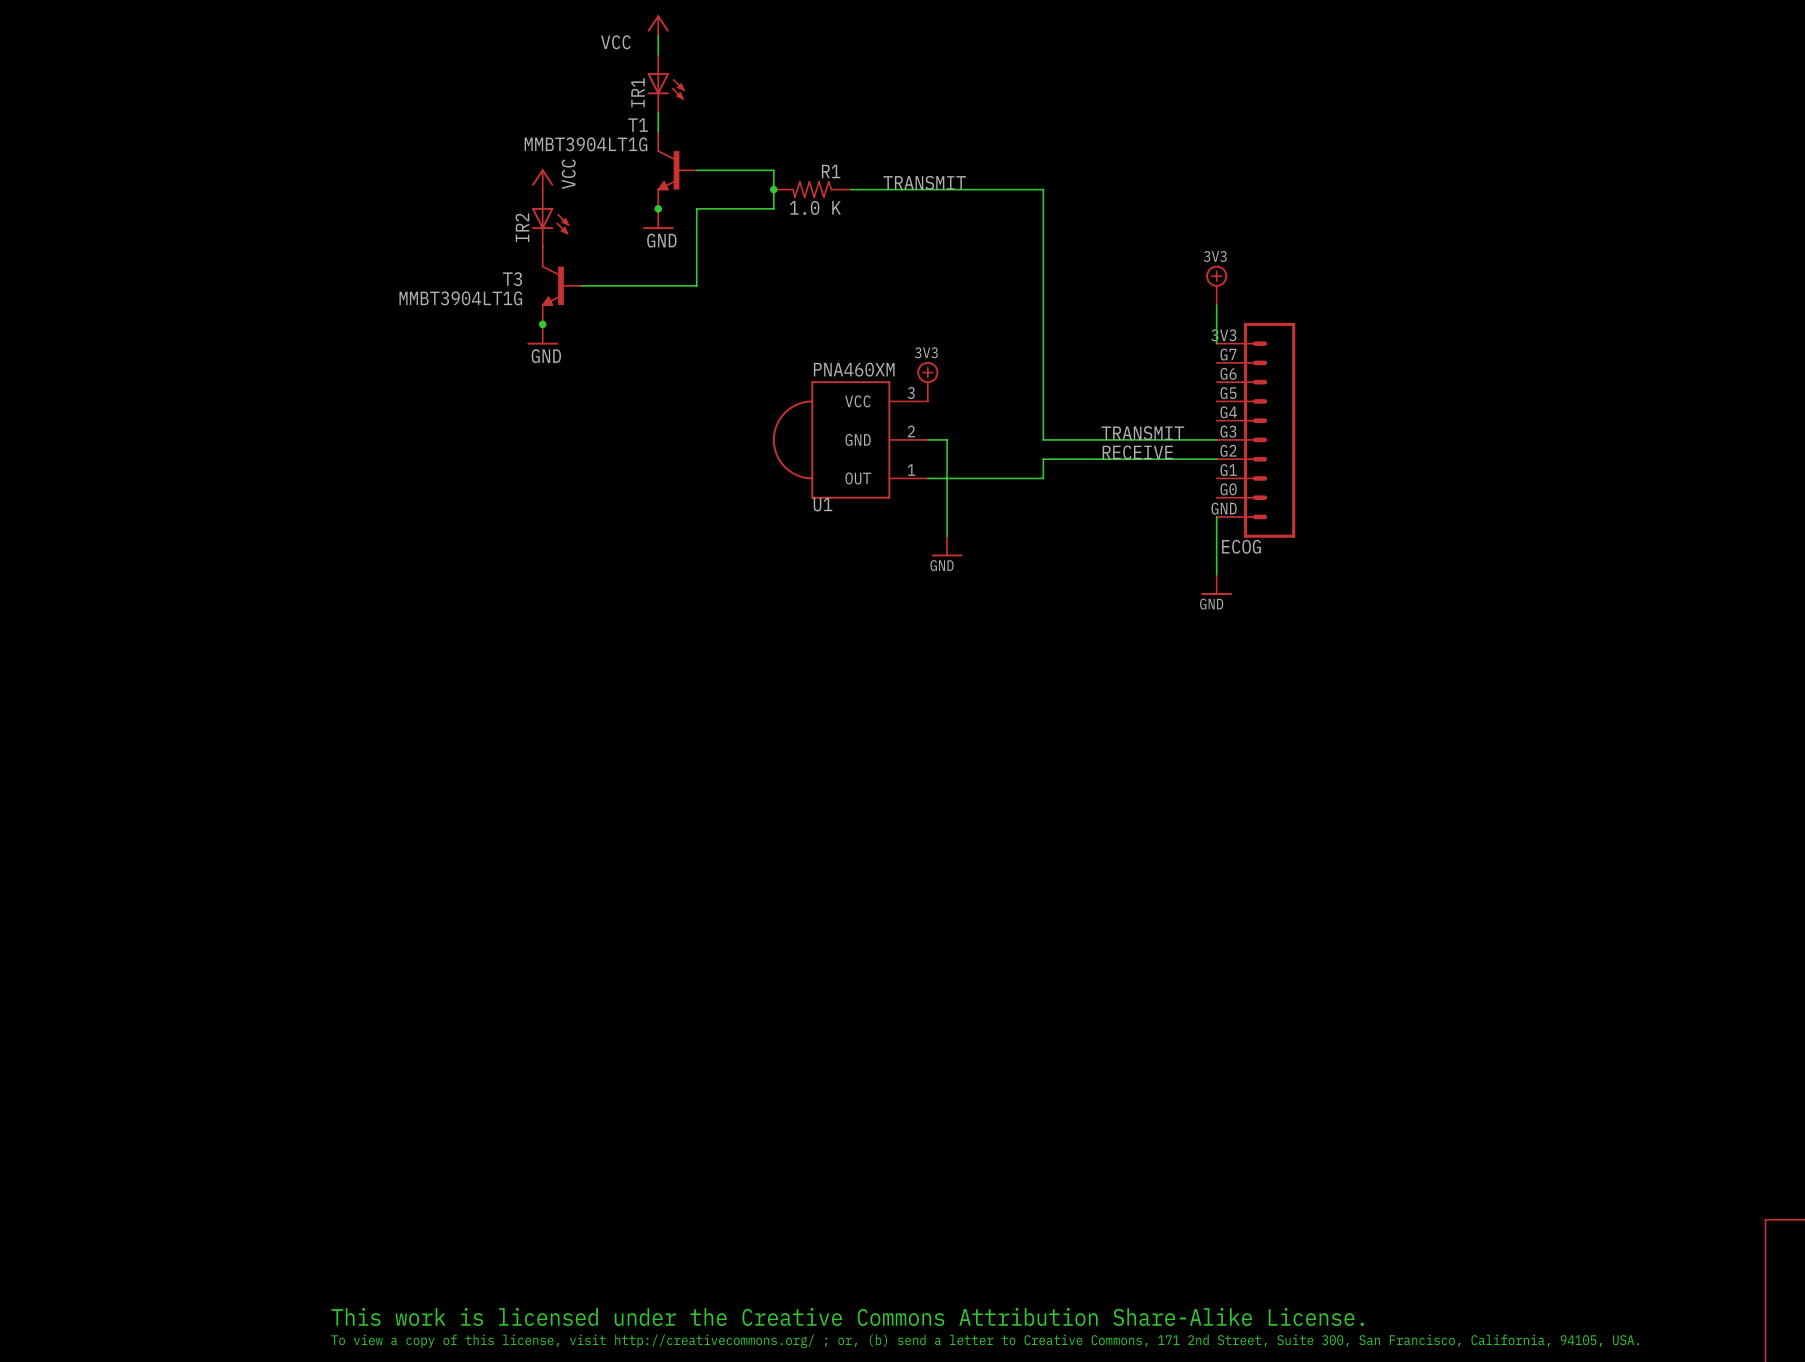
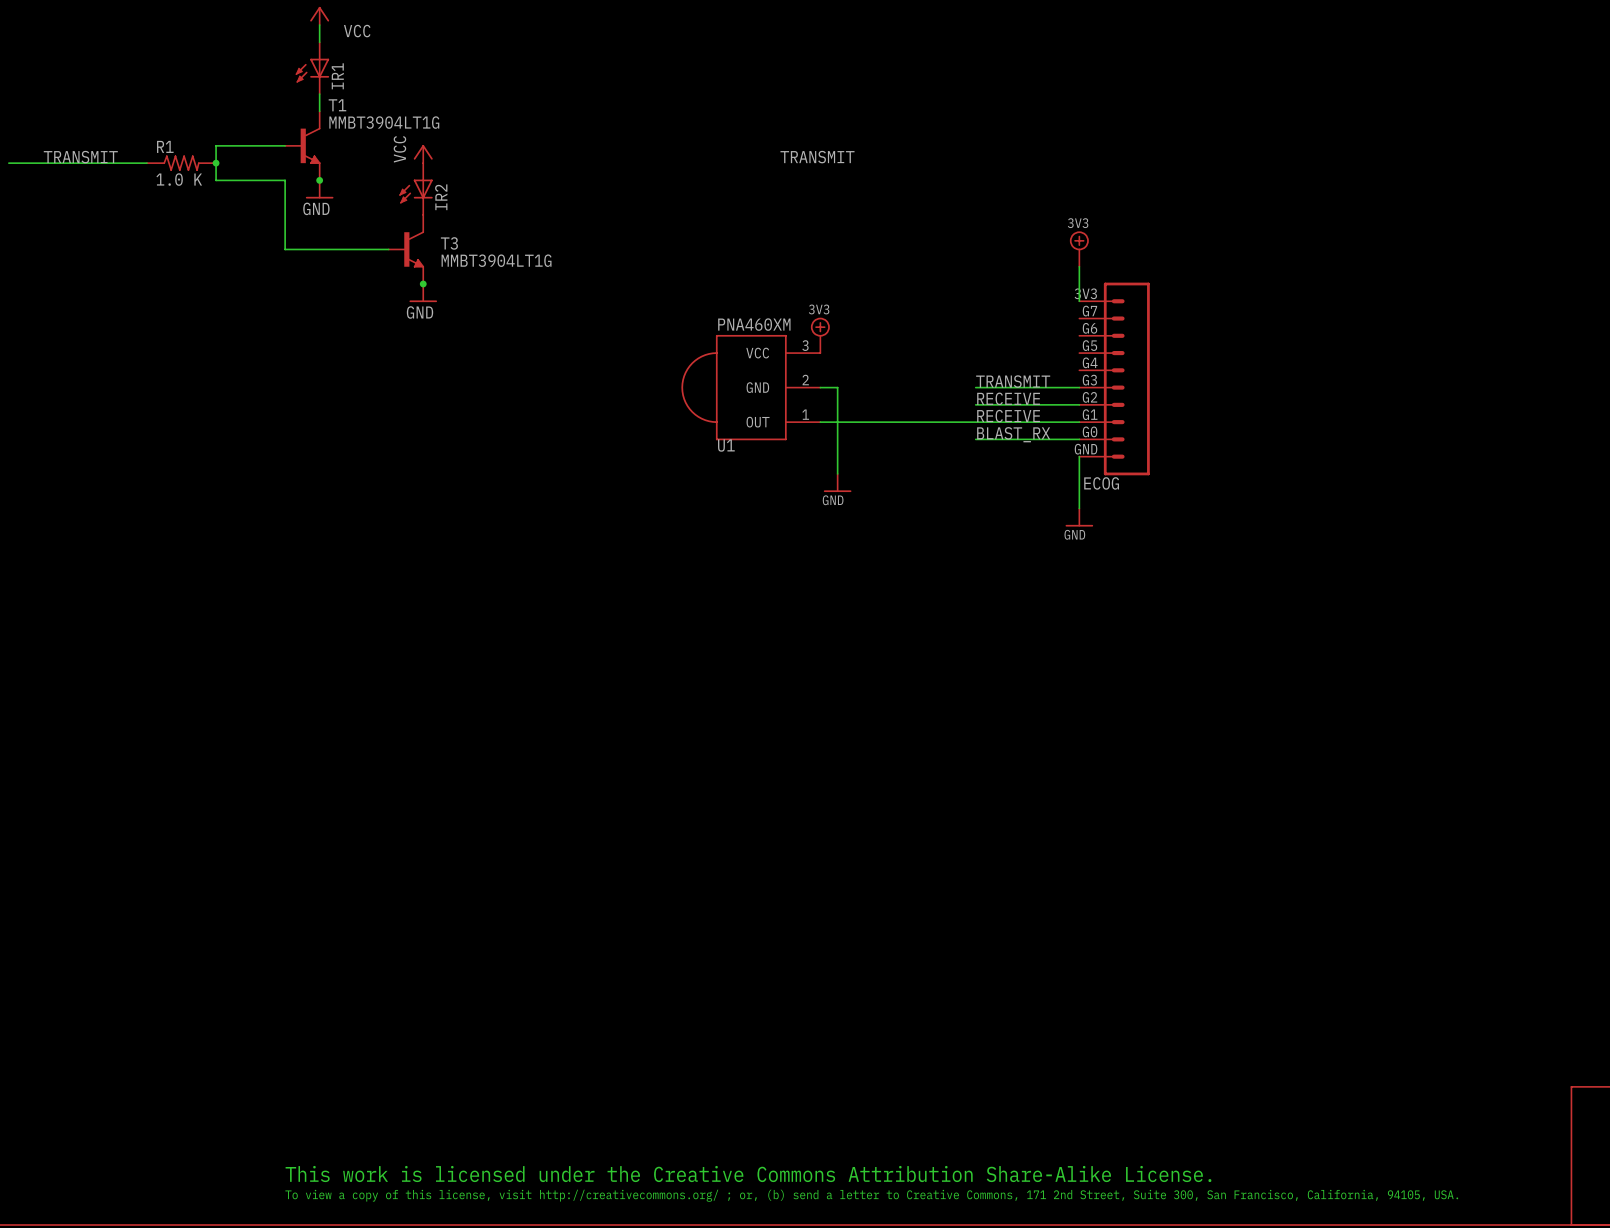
power symbol: none -> VCC (319, 15)
power symbol: VCC (658, 25) -> none
wire: none -> (319, 25) (319, 42)
wire: (658, 35) (658, 54) -> none
IR1 position: (666, 83) -> (312, 68)
IR1 flip: as is (666, 86) -> left-right (312, 70)
wire: none -> (319, 94) (319, 111)
wire: (658, 112) (658, 131) -> none
wire: none -> (285, 145) (216, 145) (216, 180) (285, 180) (285, 249) (388, 249)
T1 flip: as is (668, 170) -> left-right (310, 145)
T1 position: (677, 170) -> (302, 145)
wire: (696, 170) (773, 170) (773, 208) (696, 208) (696, 285) (581, 285) -> none
power symbol text position: VCC (568, 174) -> VCC (399, 149)
power symbol position: VCC (542, 179) -> VCC (423, 154)
label: none -> TRANSMIT (80, 157)
wire: none -> (8, 163) (146, 163)
junction: none -> (216, 163)
junction: (773, 189) -> none
R1 flip: as is (812, 189) -> left-right (181, 163)
R1 position: (812, 189) -> (181, 163)
wire: (850, 189) (1043, 189) (1043, 439) (1101, 439) -> none
junction: none -> (319, 180)
junction: (658, 208) -> none
power symbol: none -> GND (319, 189)
IR2 position: (550, 218) -> (416, 189)
power symbol: GND (658, 218) -> none
IR2 flip: as is (550, 221) -> left-right (416, 191)
T3 flip: as is (553, 285) -> left-right (414, 249)
T3 position: (561, 285) -> (406, 249)
junction: none -> (423, 284)
junction: (542, 324) -> none
power symbol position: GND (542, 334) -> GND (423, 293)
power symbol text position: GND (546, 356) -> GND (420, 312)
wire: (1101, 459) (1043, 459) (1043, 478) -> (1079, 422) (923, 422)
label: none -> RECEIVE (1008, 416)
label: none -> BLAST_RX (1013, 434)
wire: none -> (975, 439) (1079, 439)

